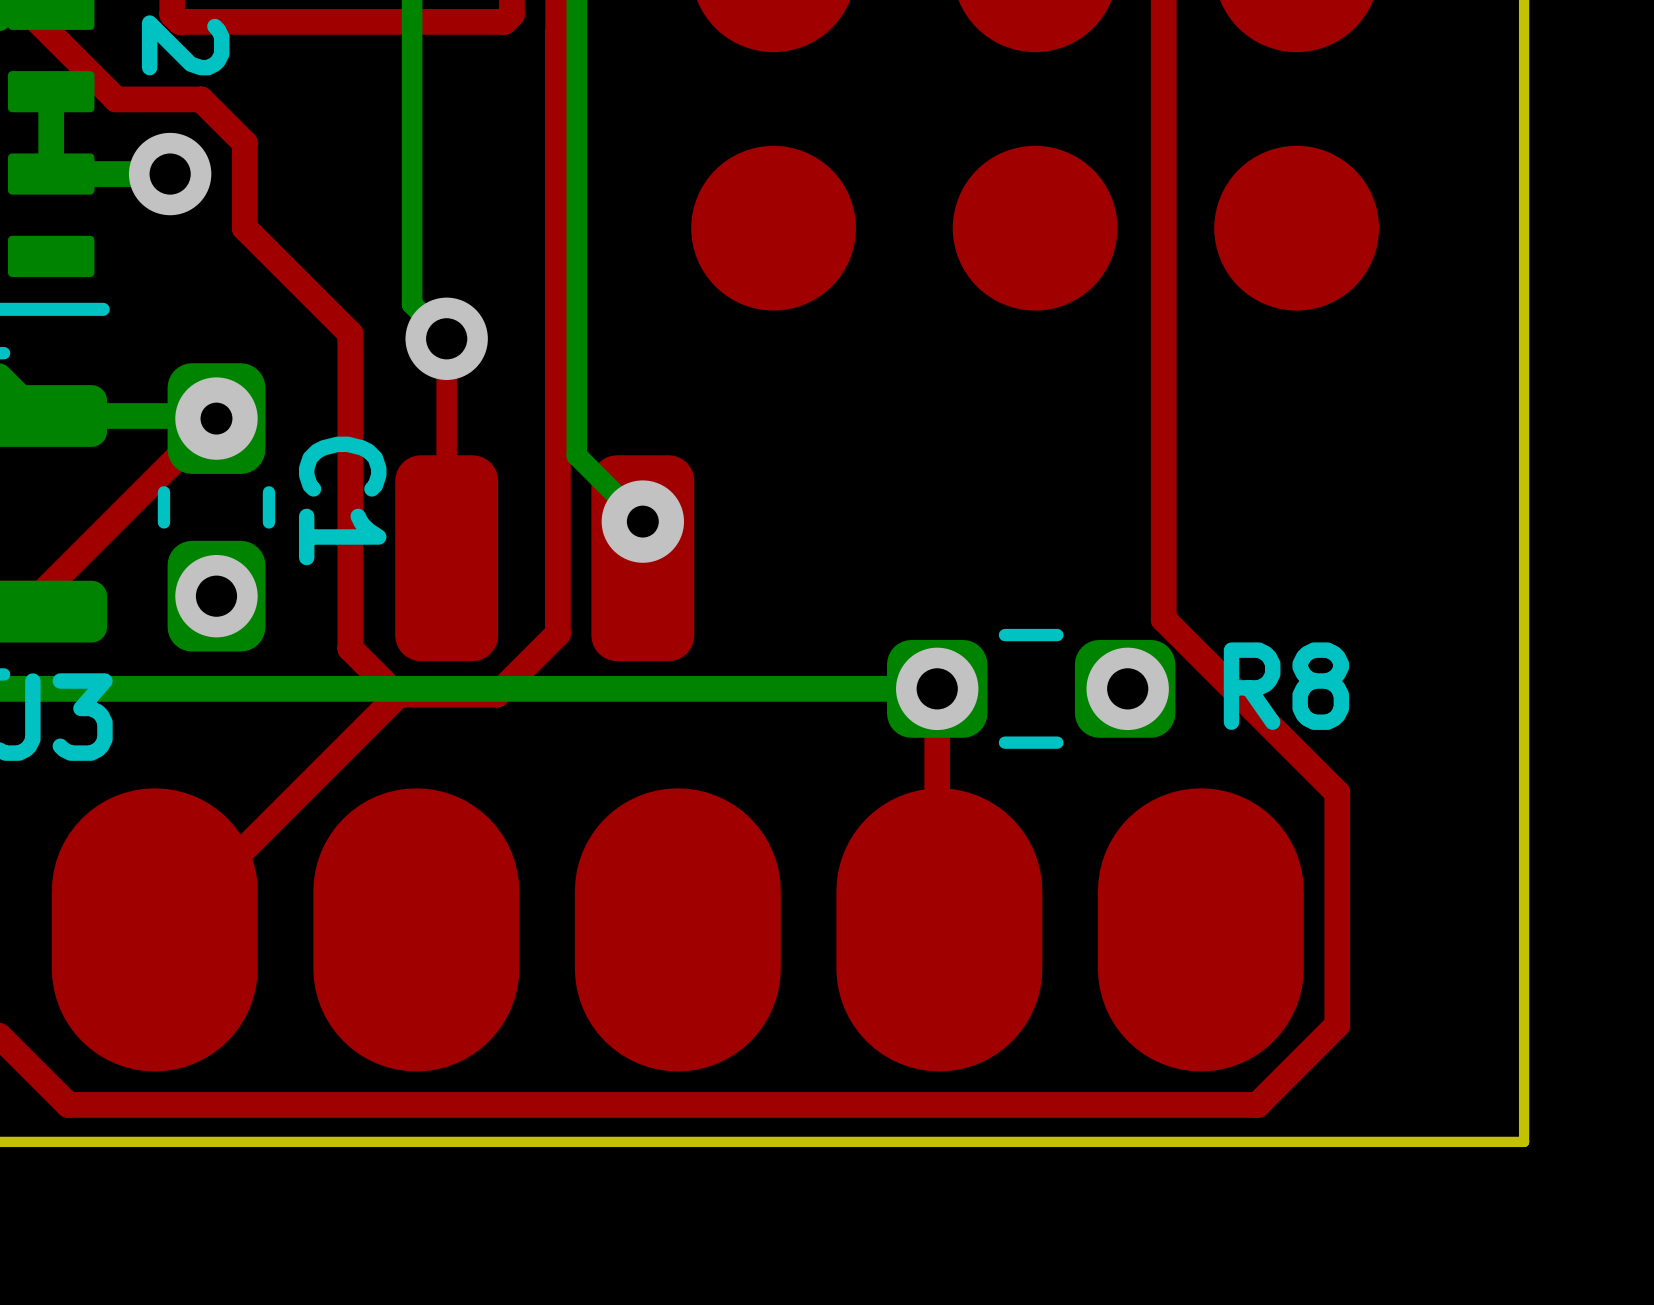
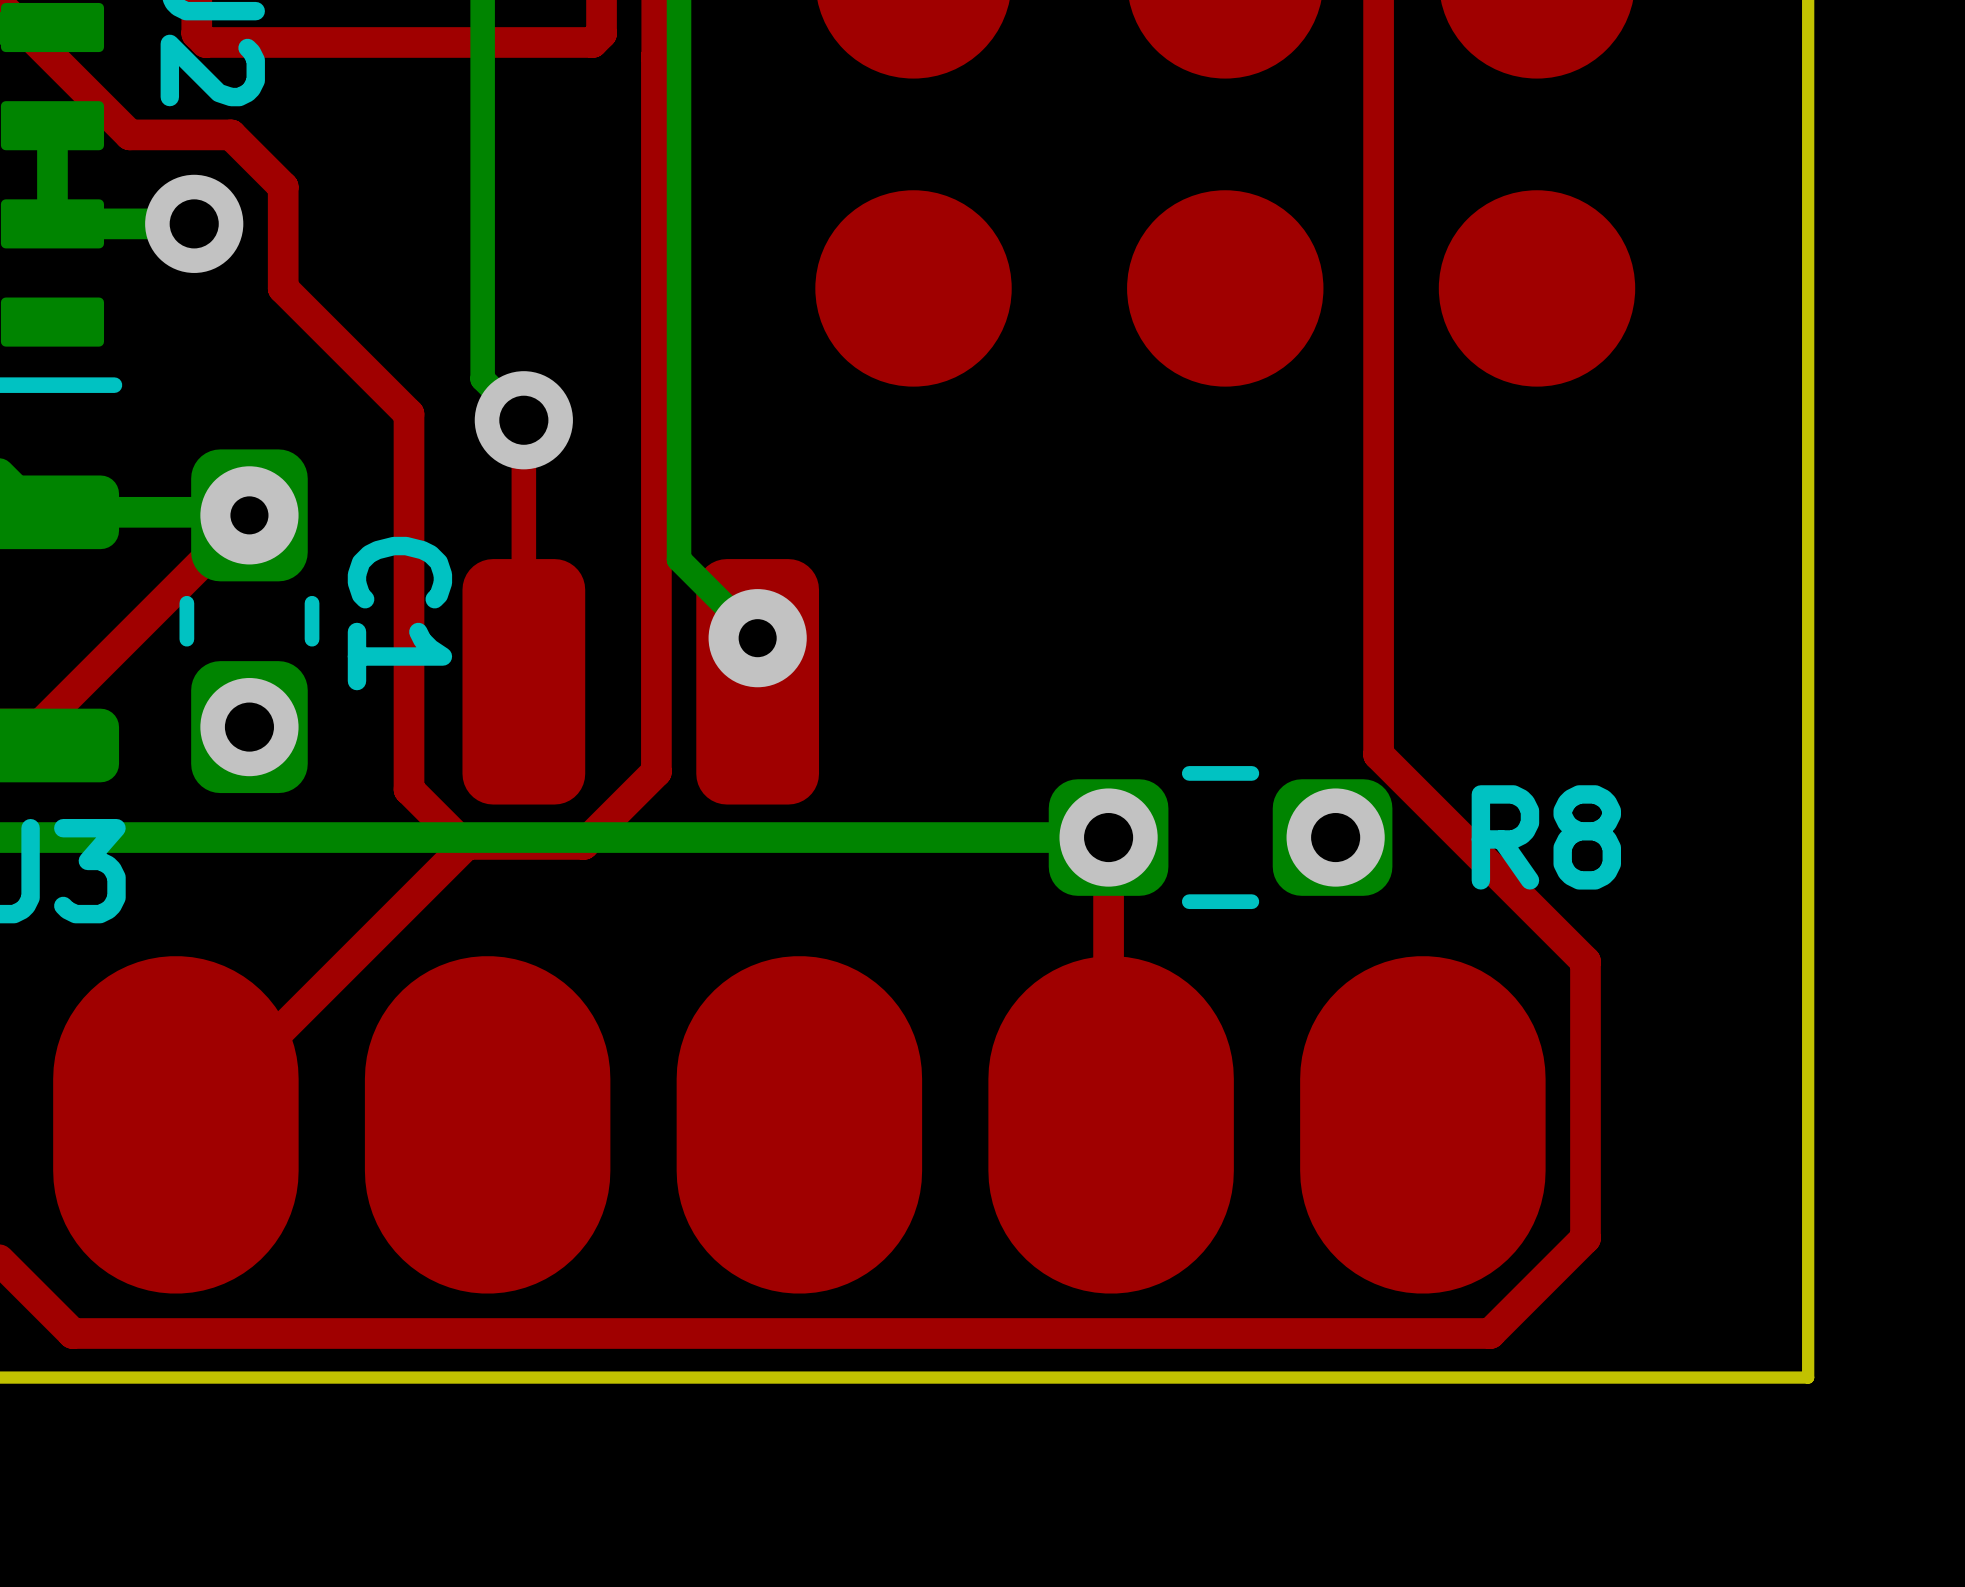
R8 name position: R8 (1286, 686) -> R8 (1546, 837)

